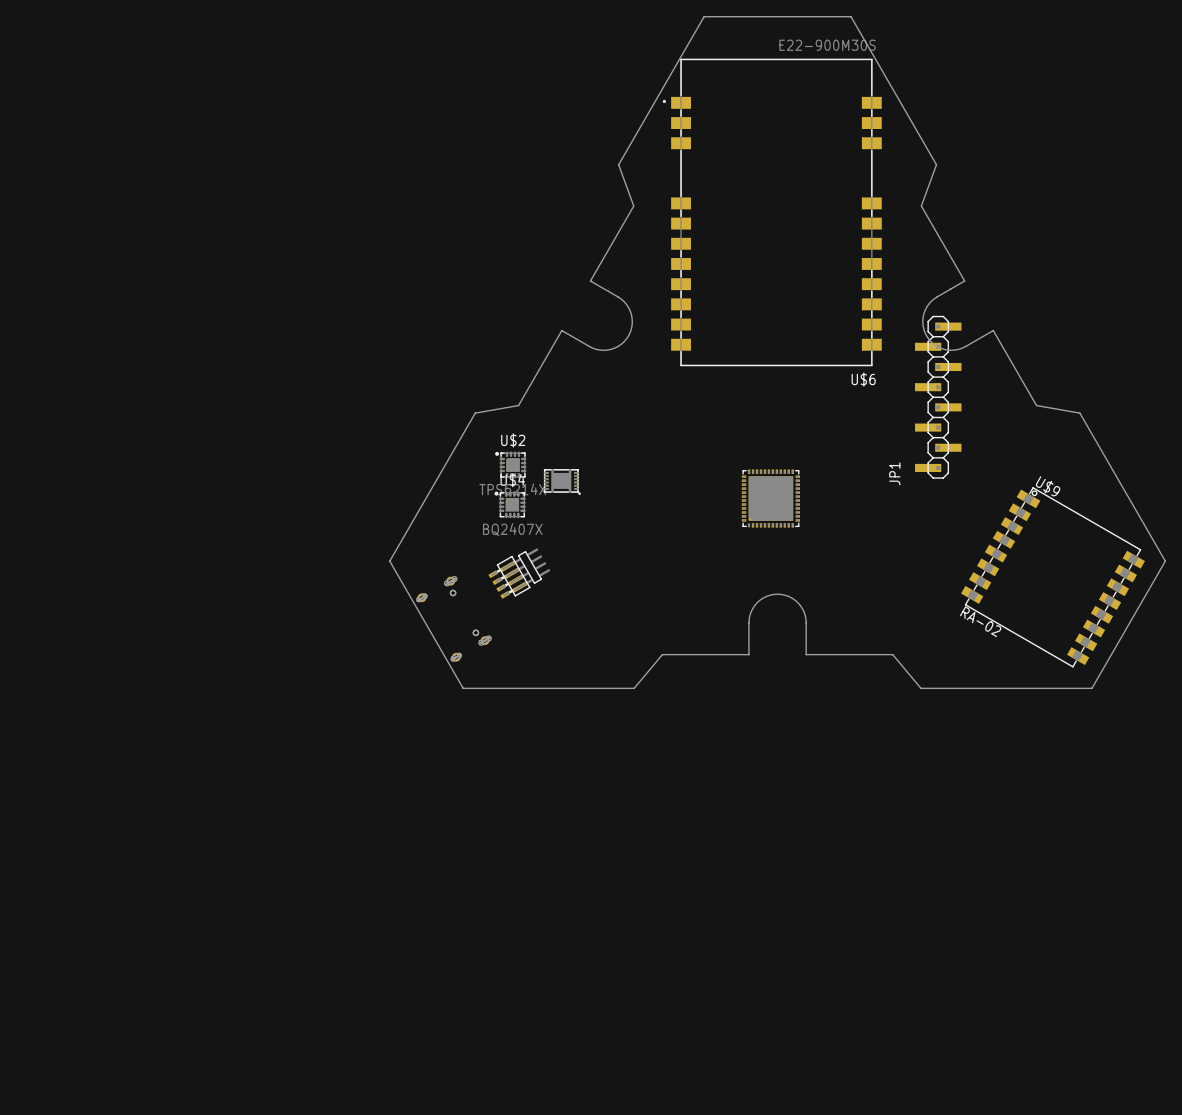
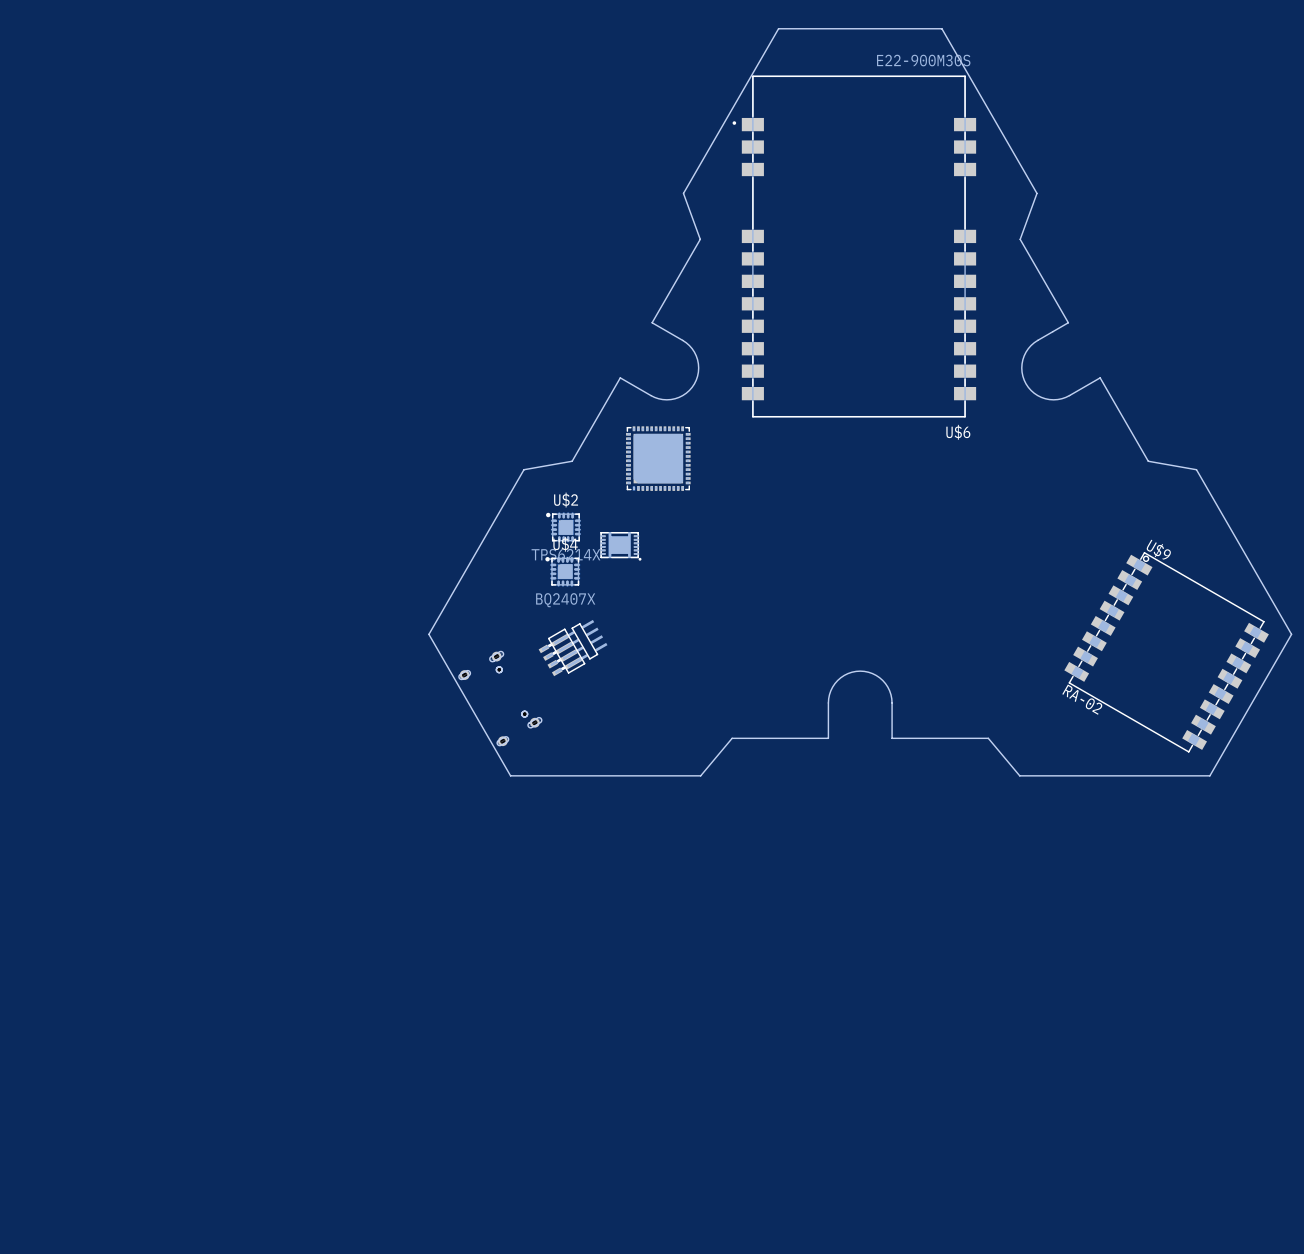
JP1: (938, 397) -> none
part: none -> (658, 458)
part: (770, 498) -> none

